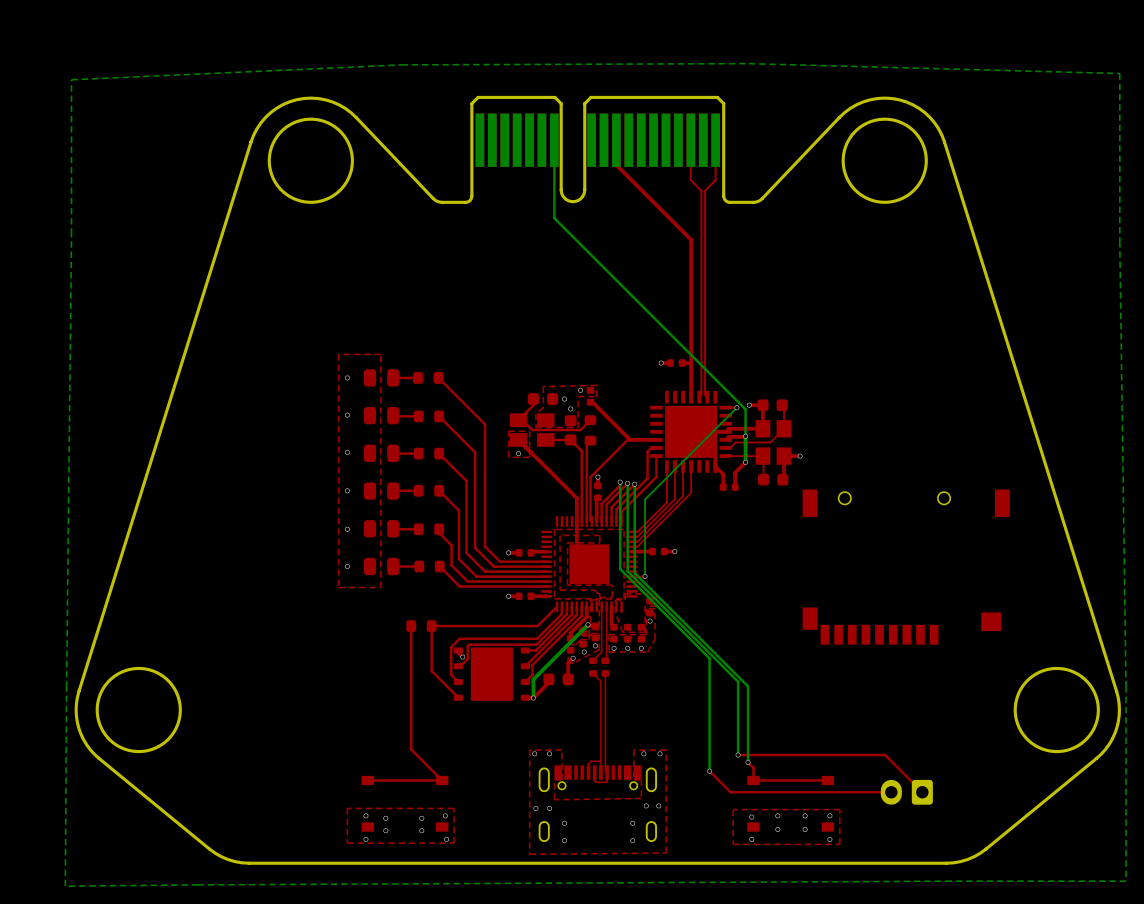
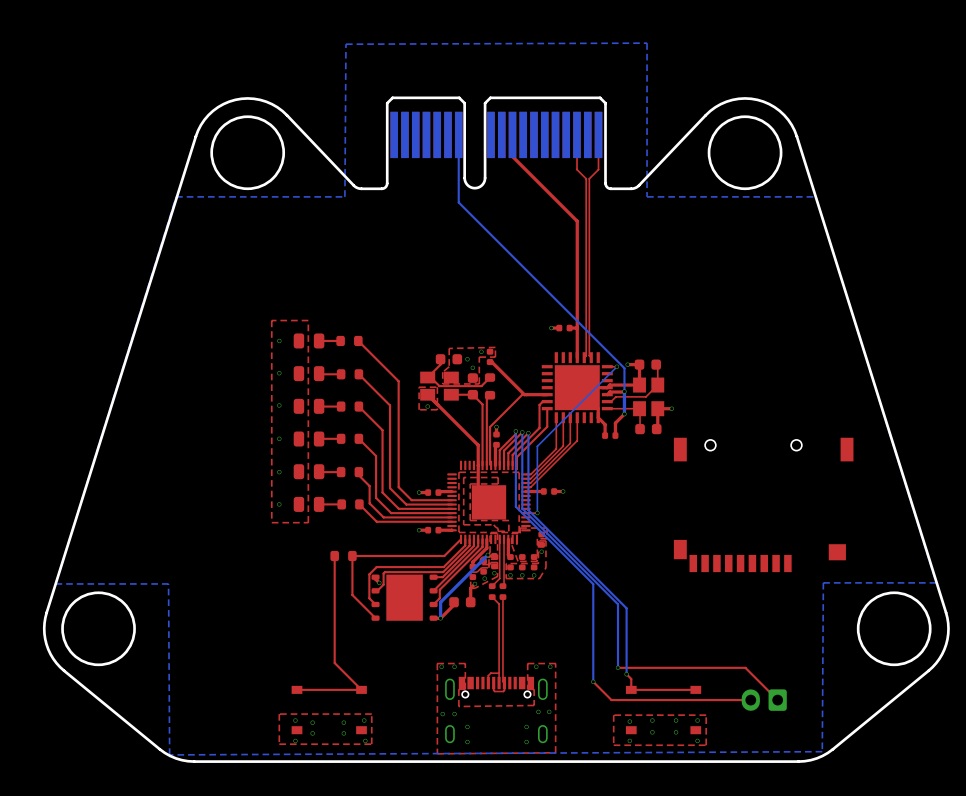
bottom zone outline: (748, 63) (401, 64) (71, 79) (65, 886) (1126, 881) (1119, 73) (748, 63) -> (647, 43) (647, 196) (815, 196) (936, 582) (823, 582) (822, 751) (169, 754) (168, 583) (55, 583) (176, 196) (344, 196) (345, 44) (647, 43)

